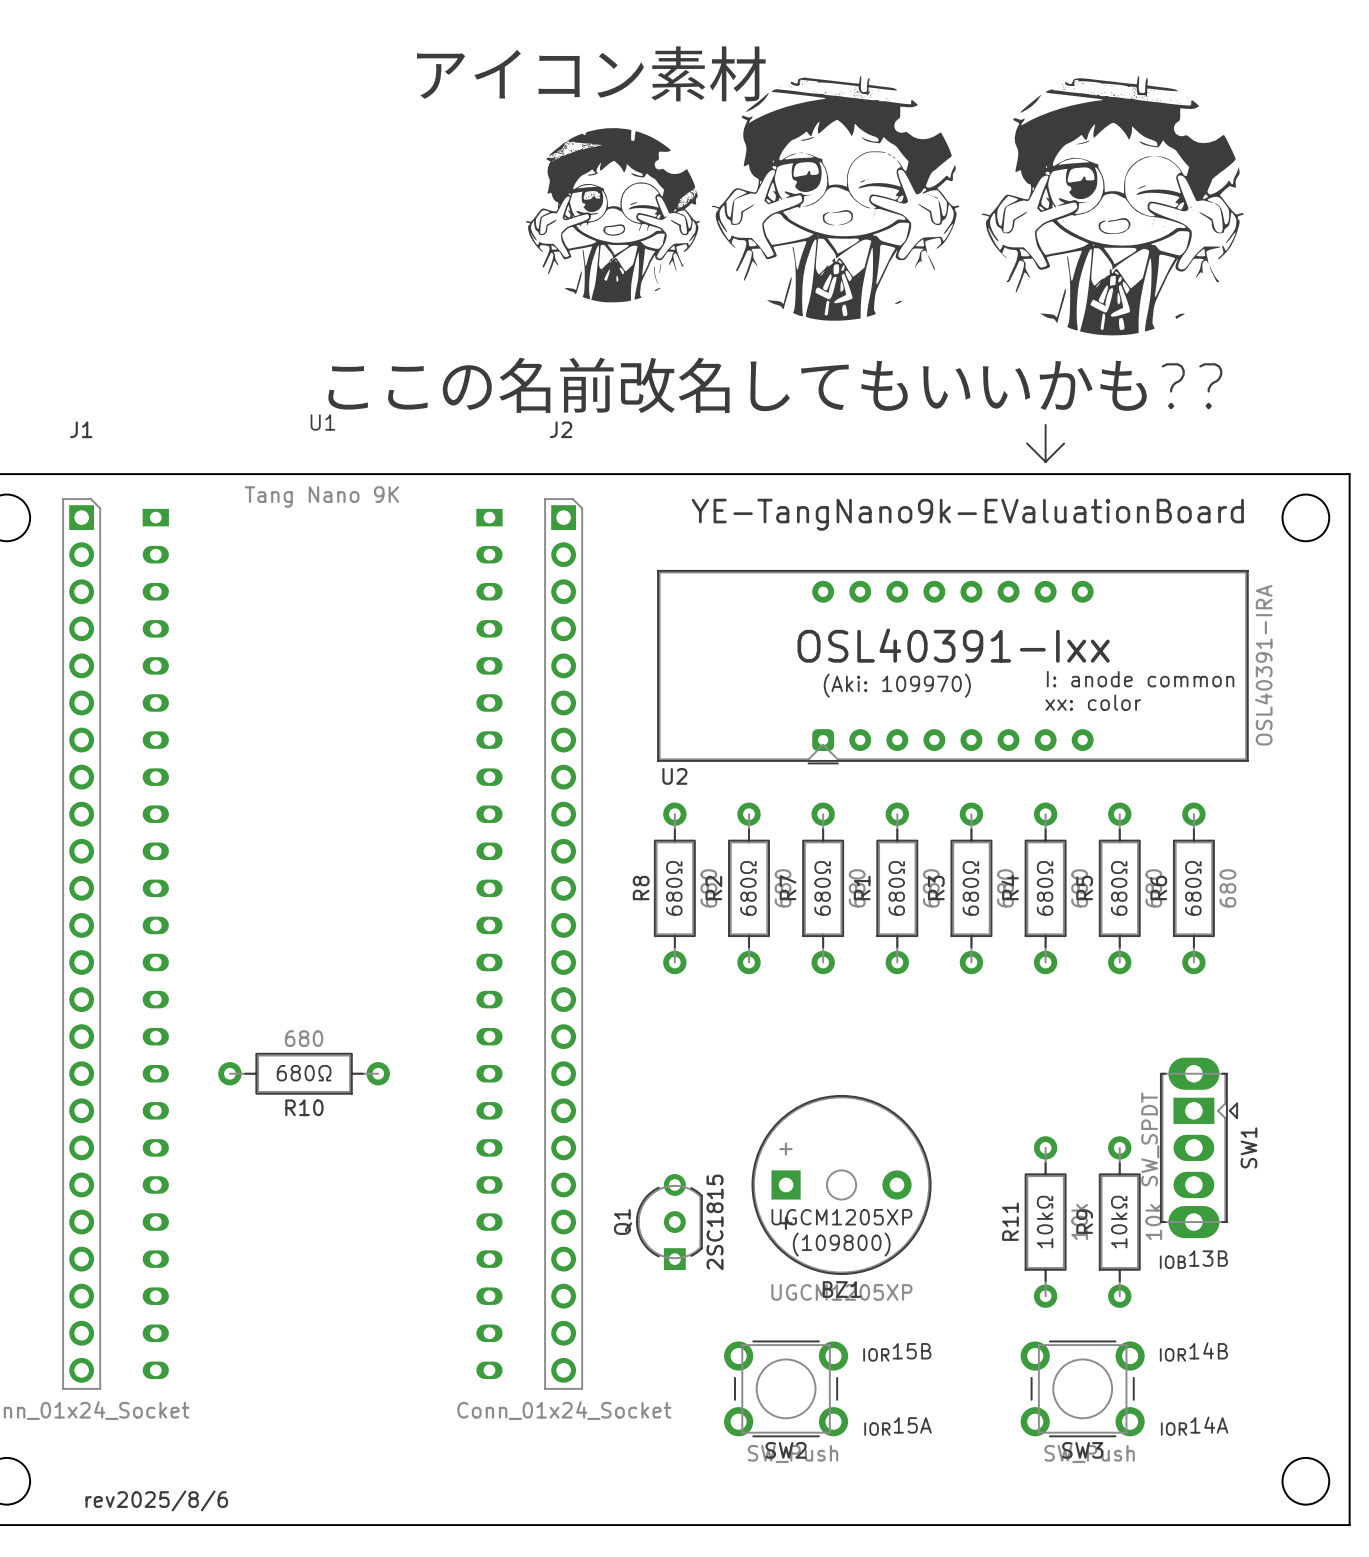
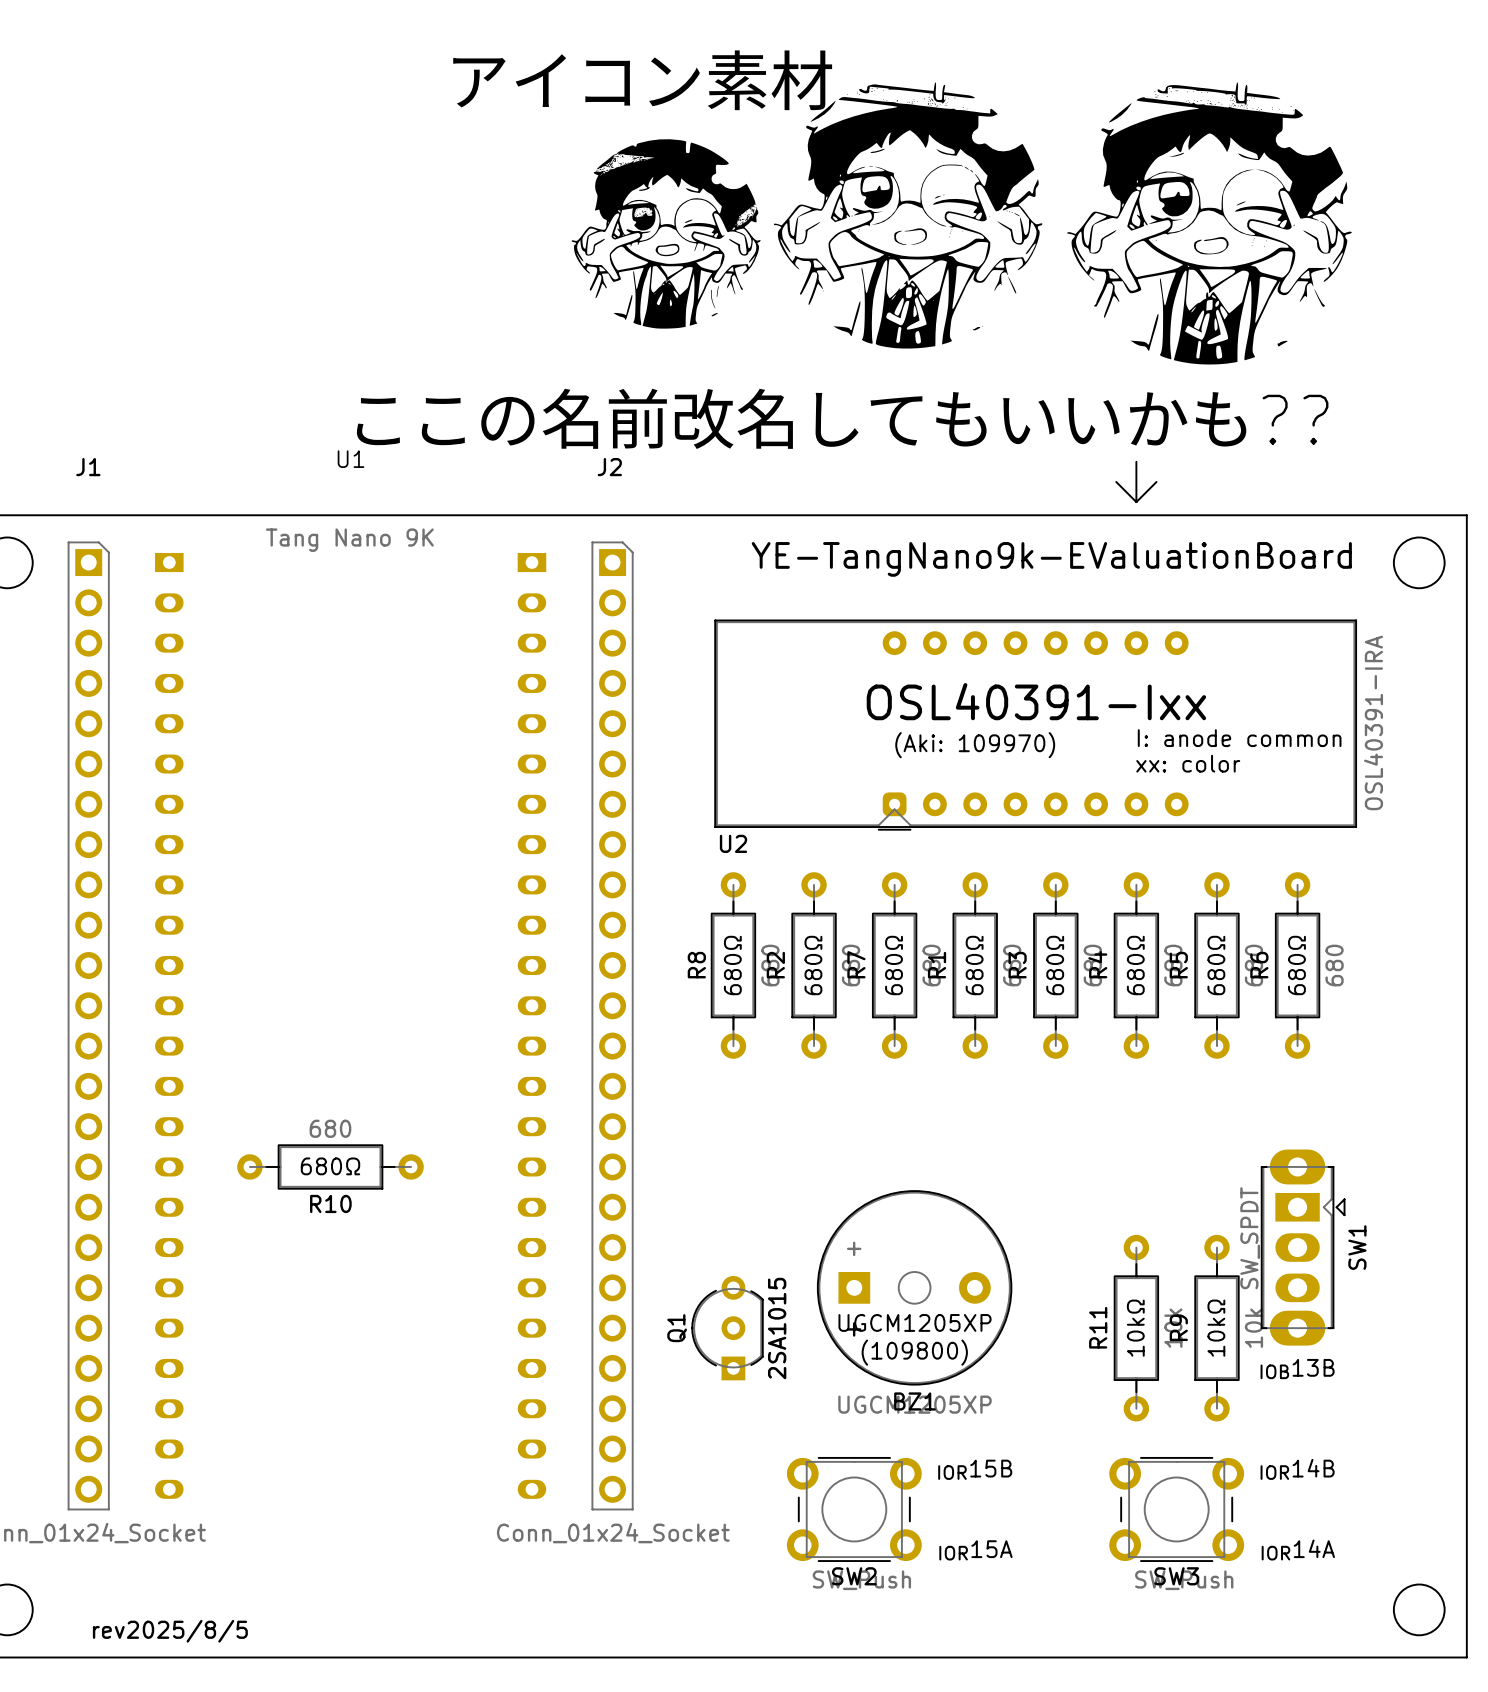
Q1 text: 2SC1815 (715, 1222) -> 2SA1015 (777, 1328)
text: rev2025/8/6 (156, 1500) -> rev2025/8/5 (170, 1631)

